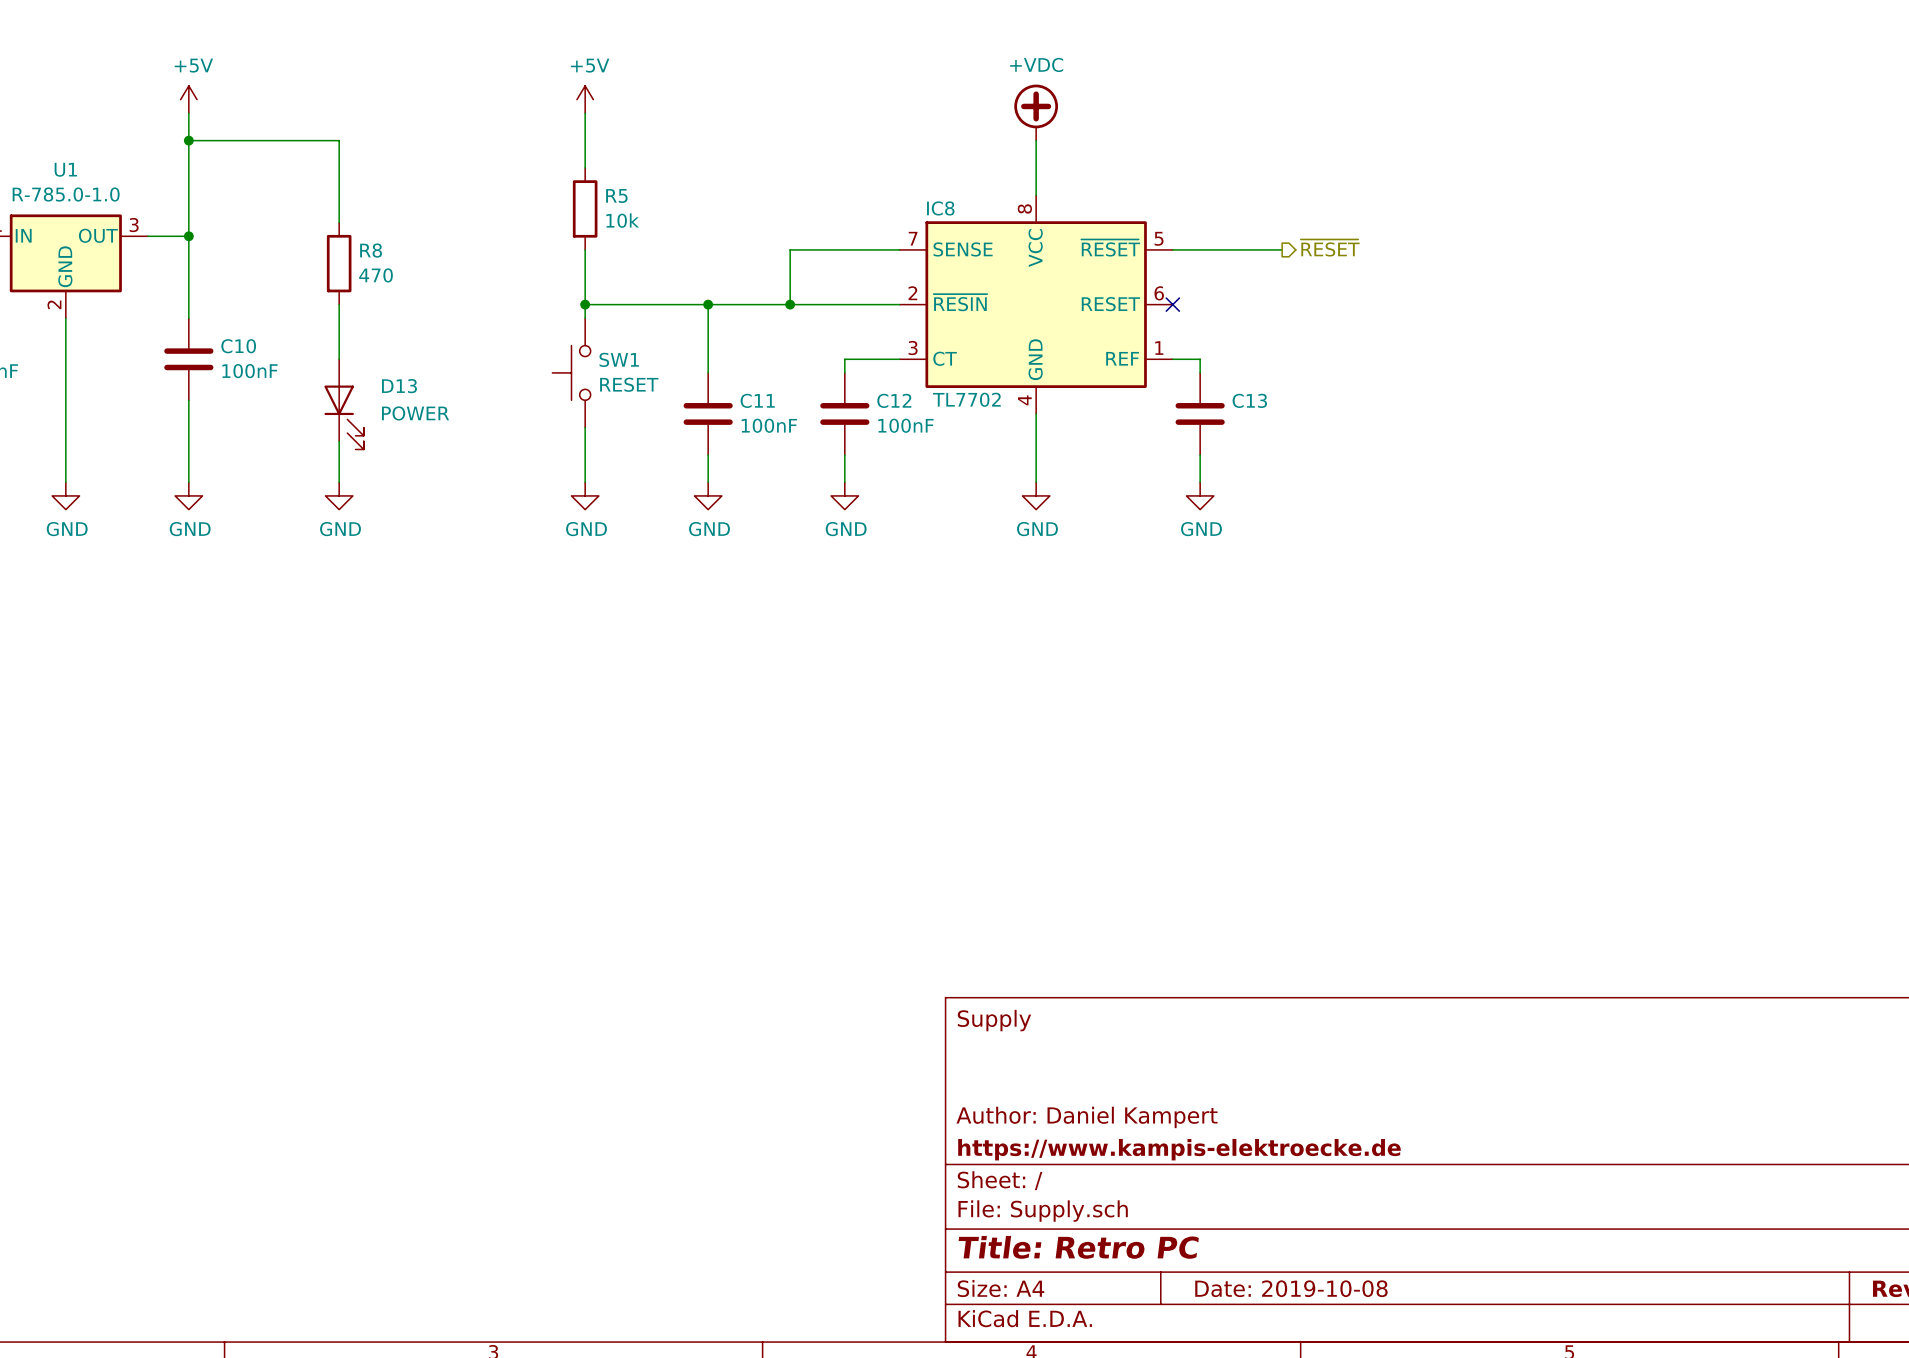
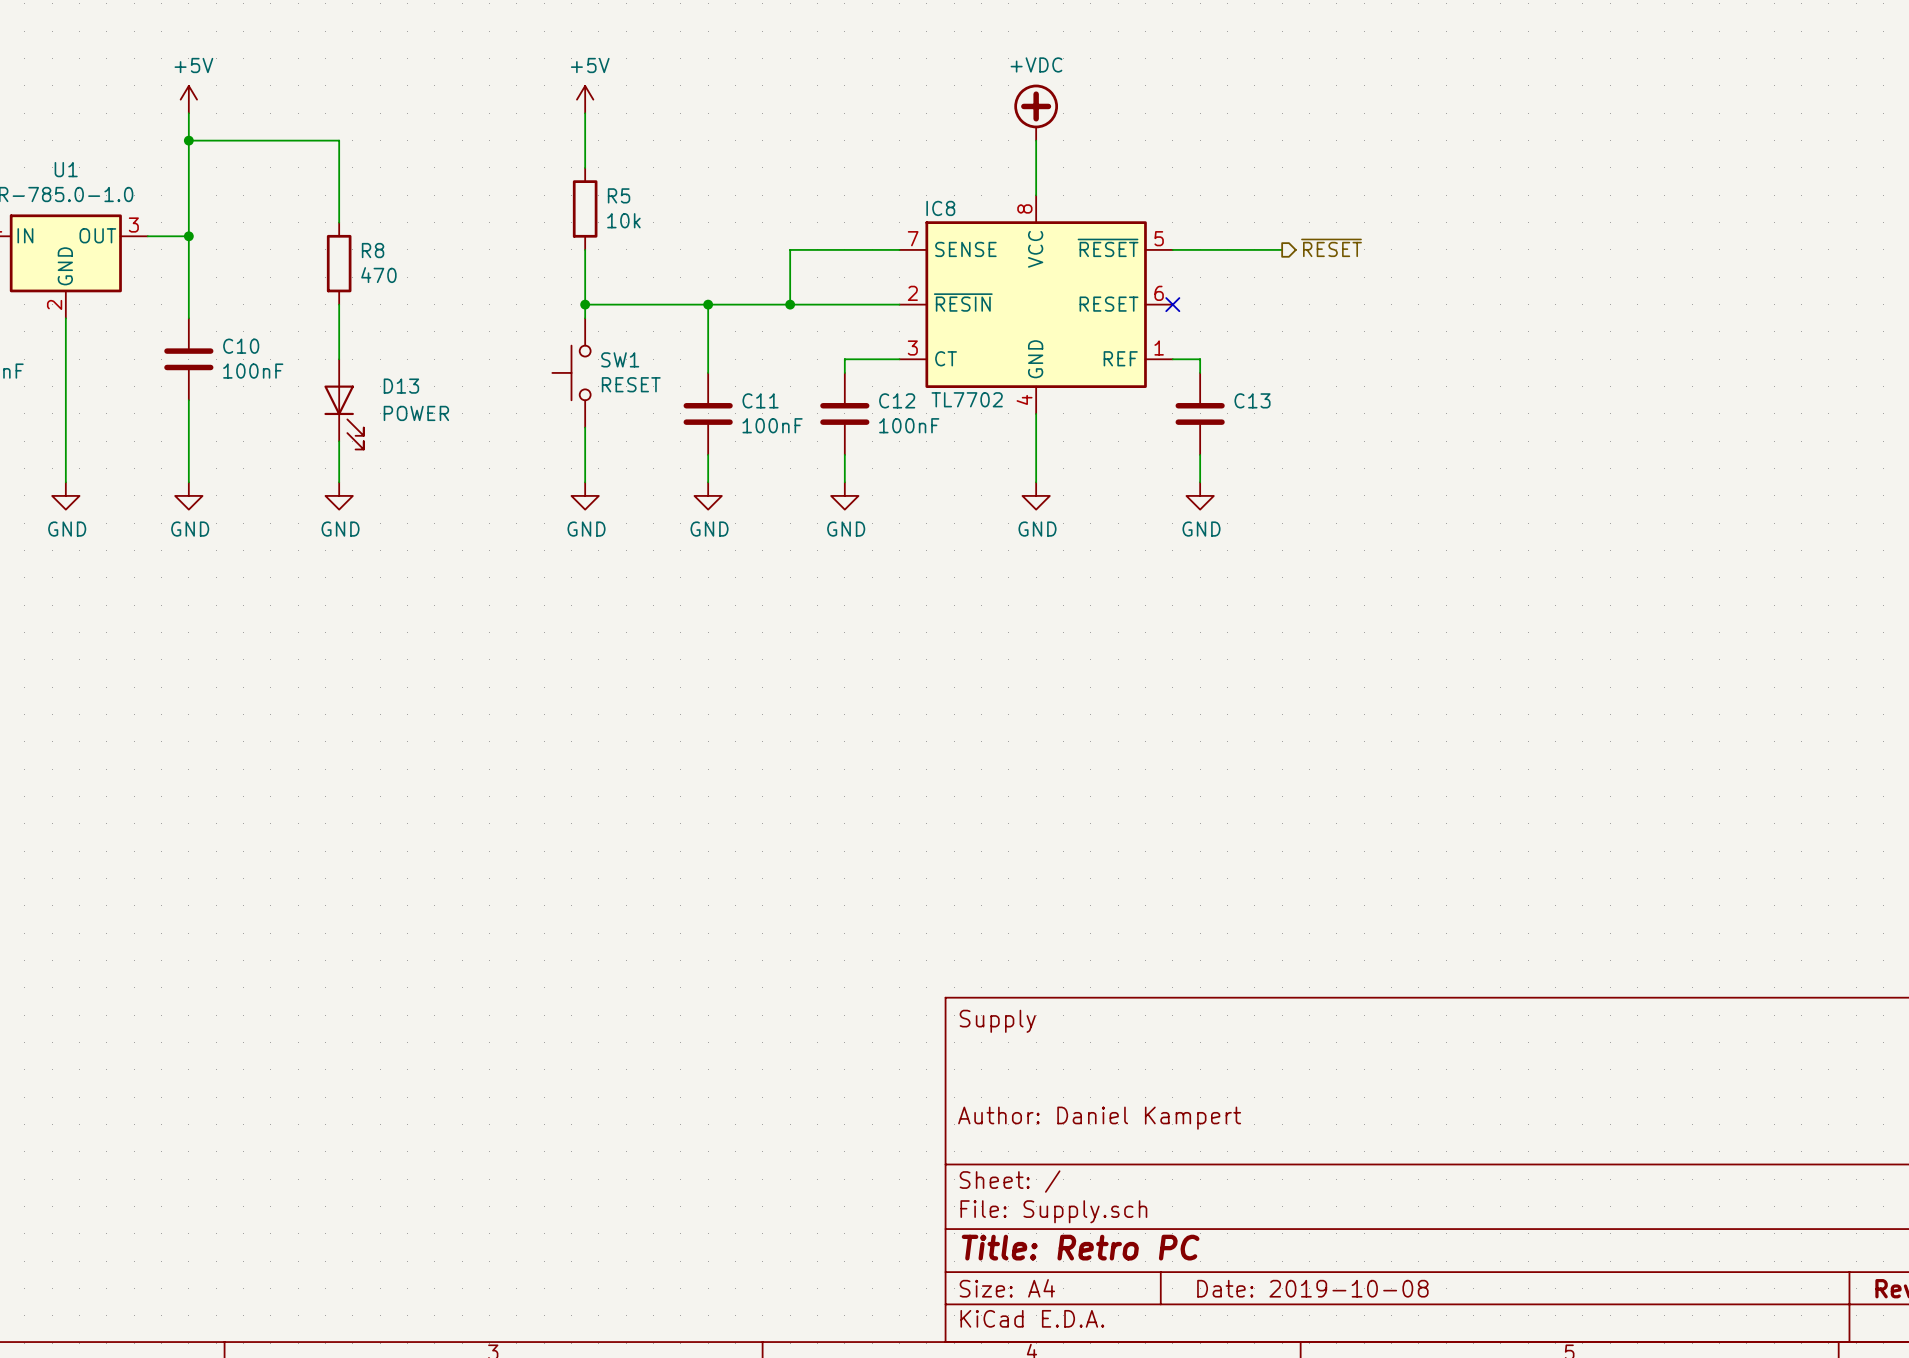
title block: https://www.kampis-elektroecke.de (1179, 1149) -> none

